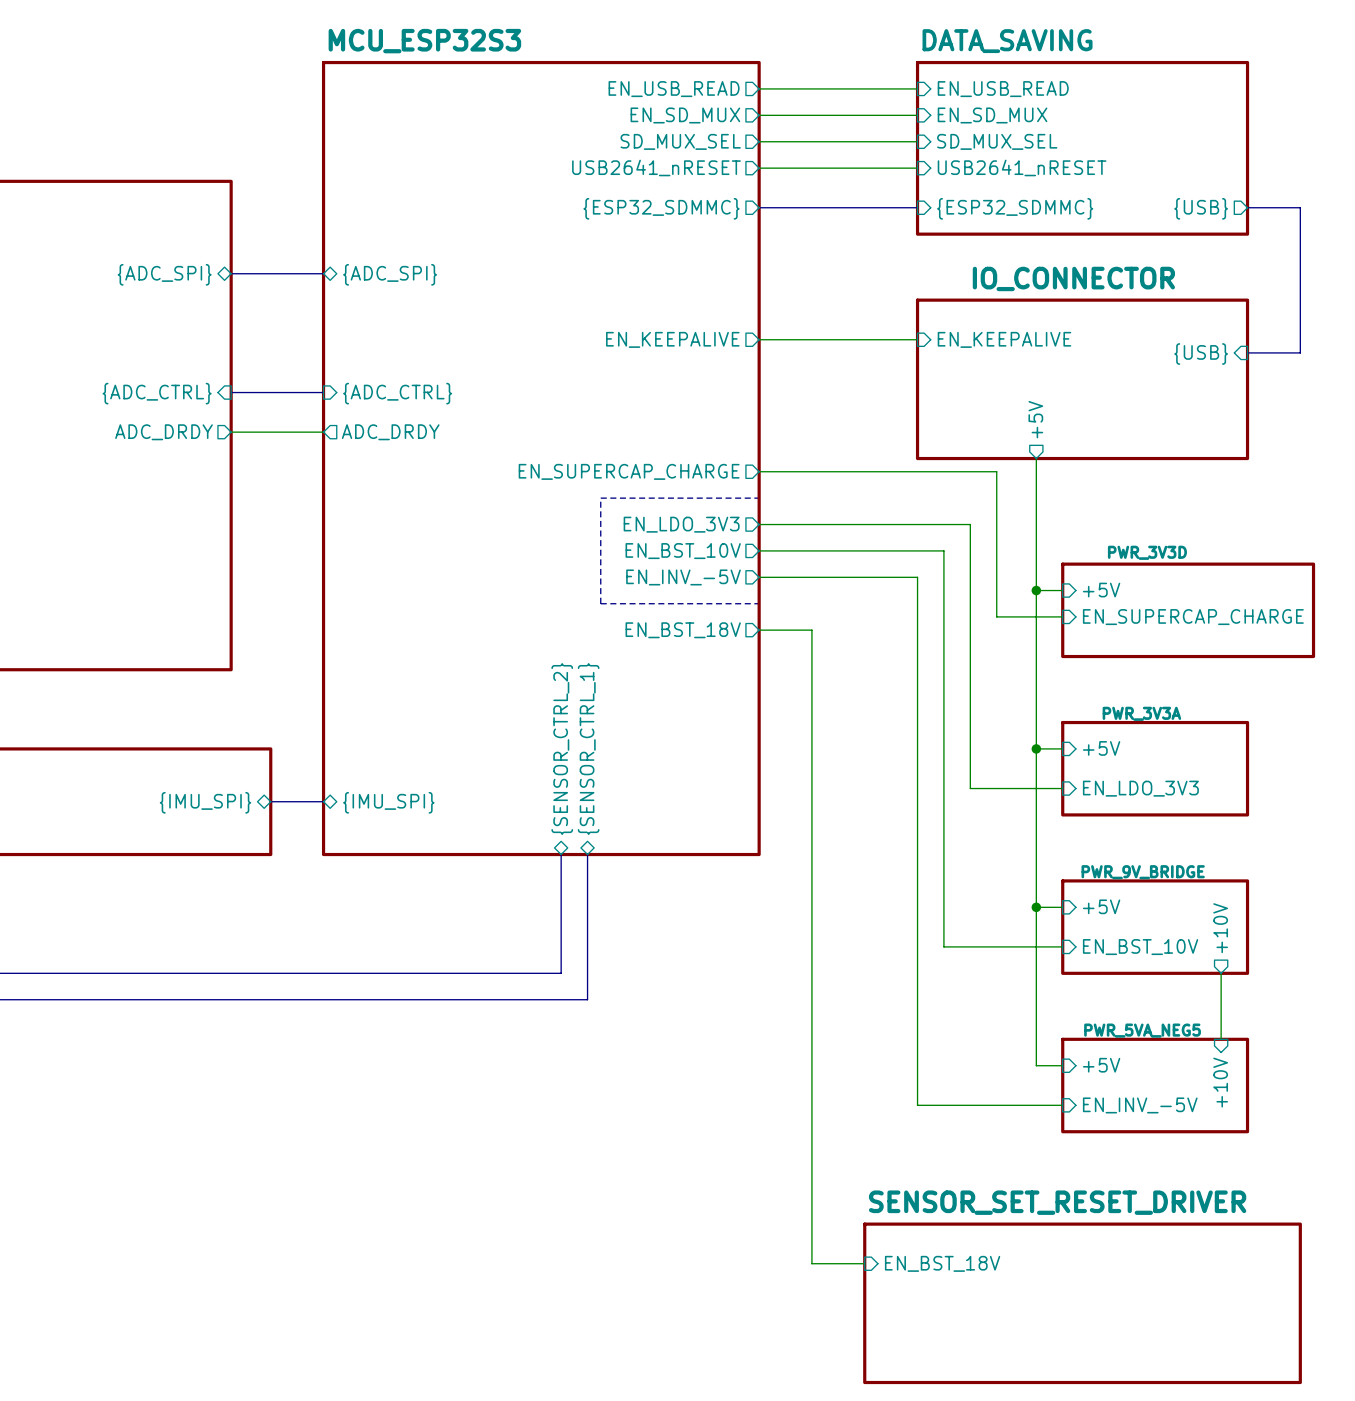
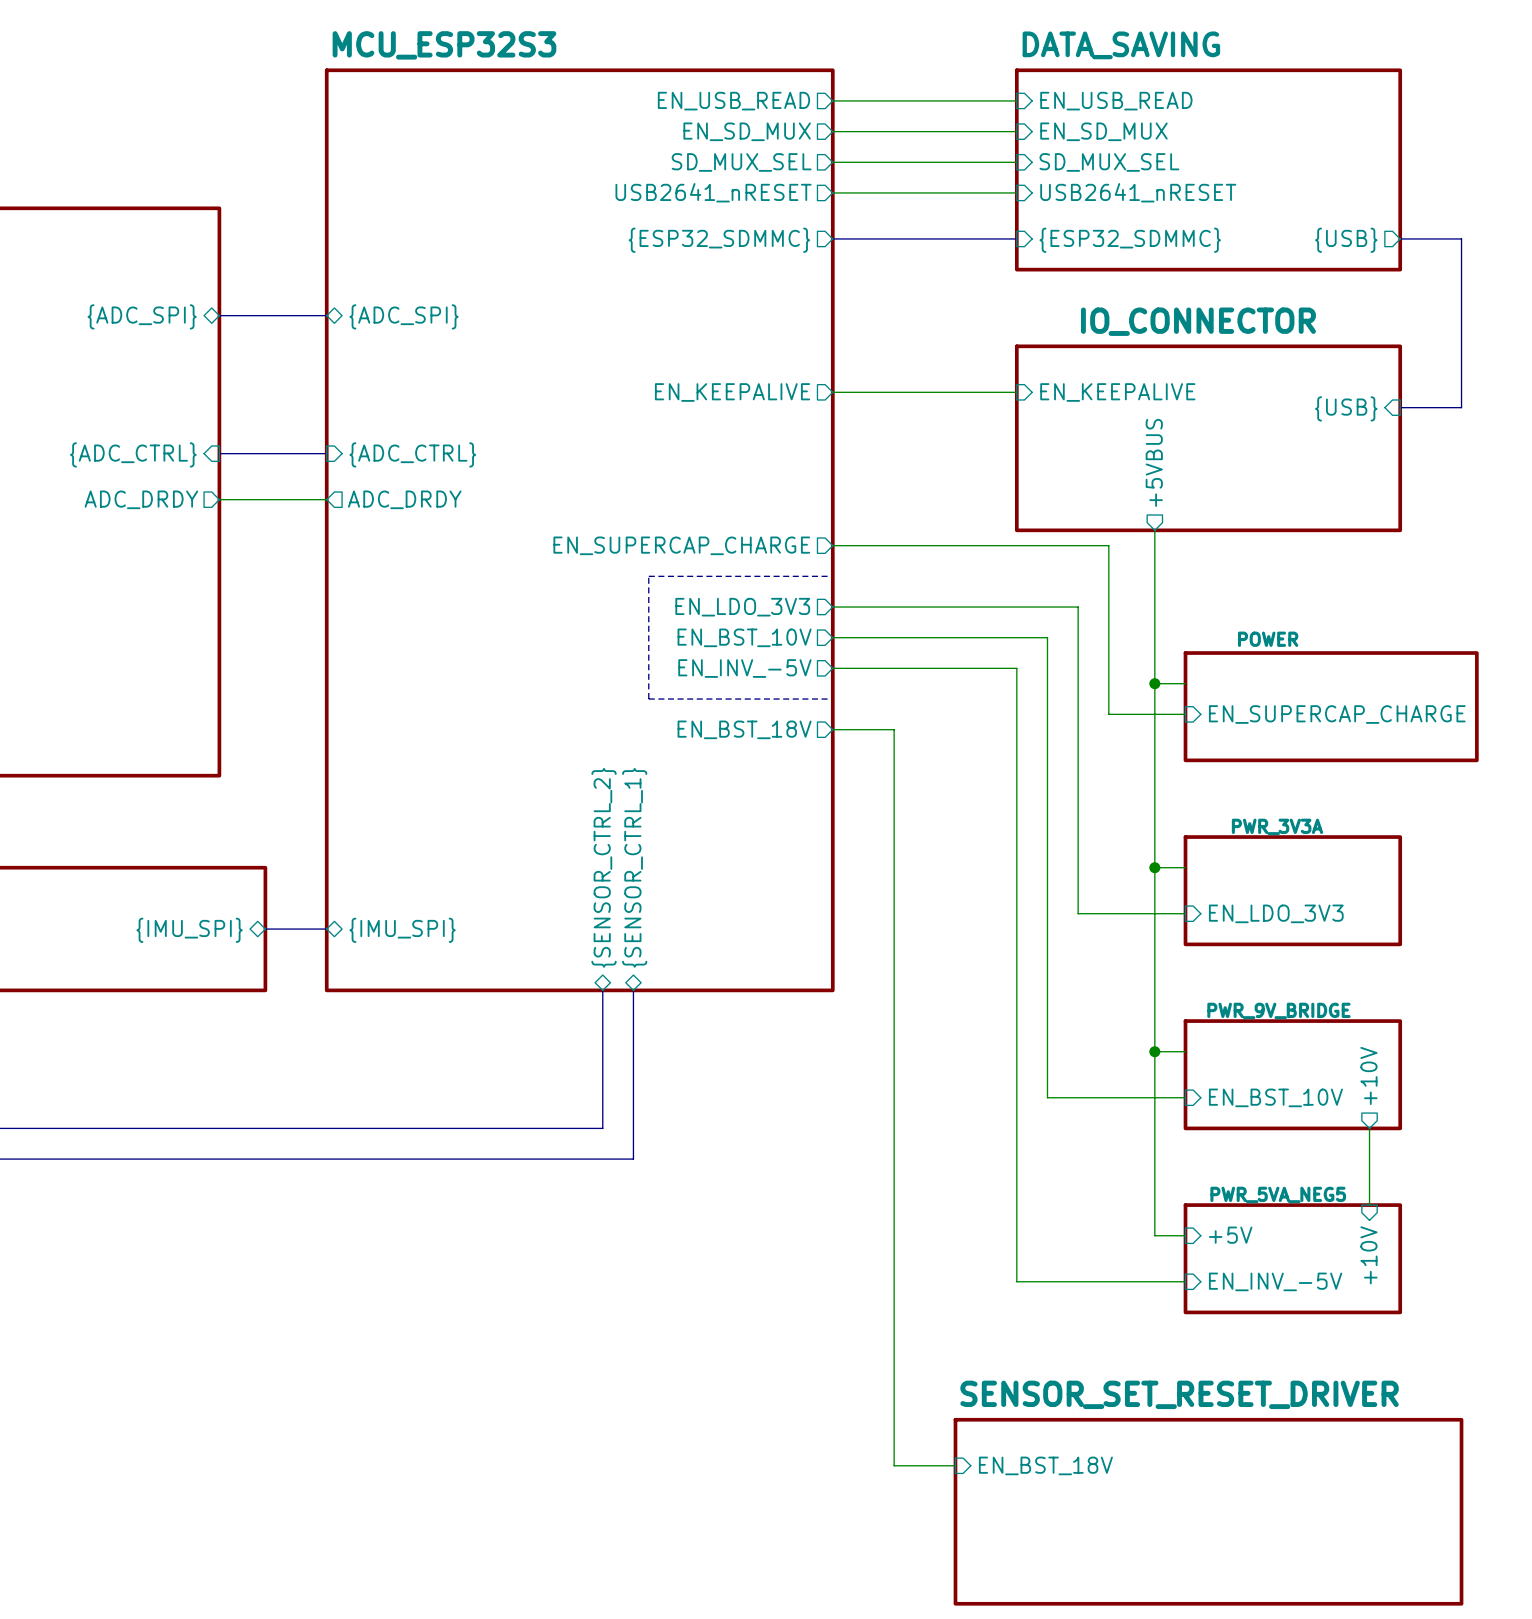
sheet pin: +5V (1035, 419) -> +5VBUS (1154, 462)
sheet PWR_3V3D name: PWR_3V3D (1147, 552) -> POWER (1268, 639)
sheet pin: +5V (1101, 590) -> none
sheet pin: +5V (1101, 748) -> none
sheet pin: +5V (1101, 906) -> none

